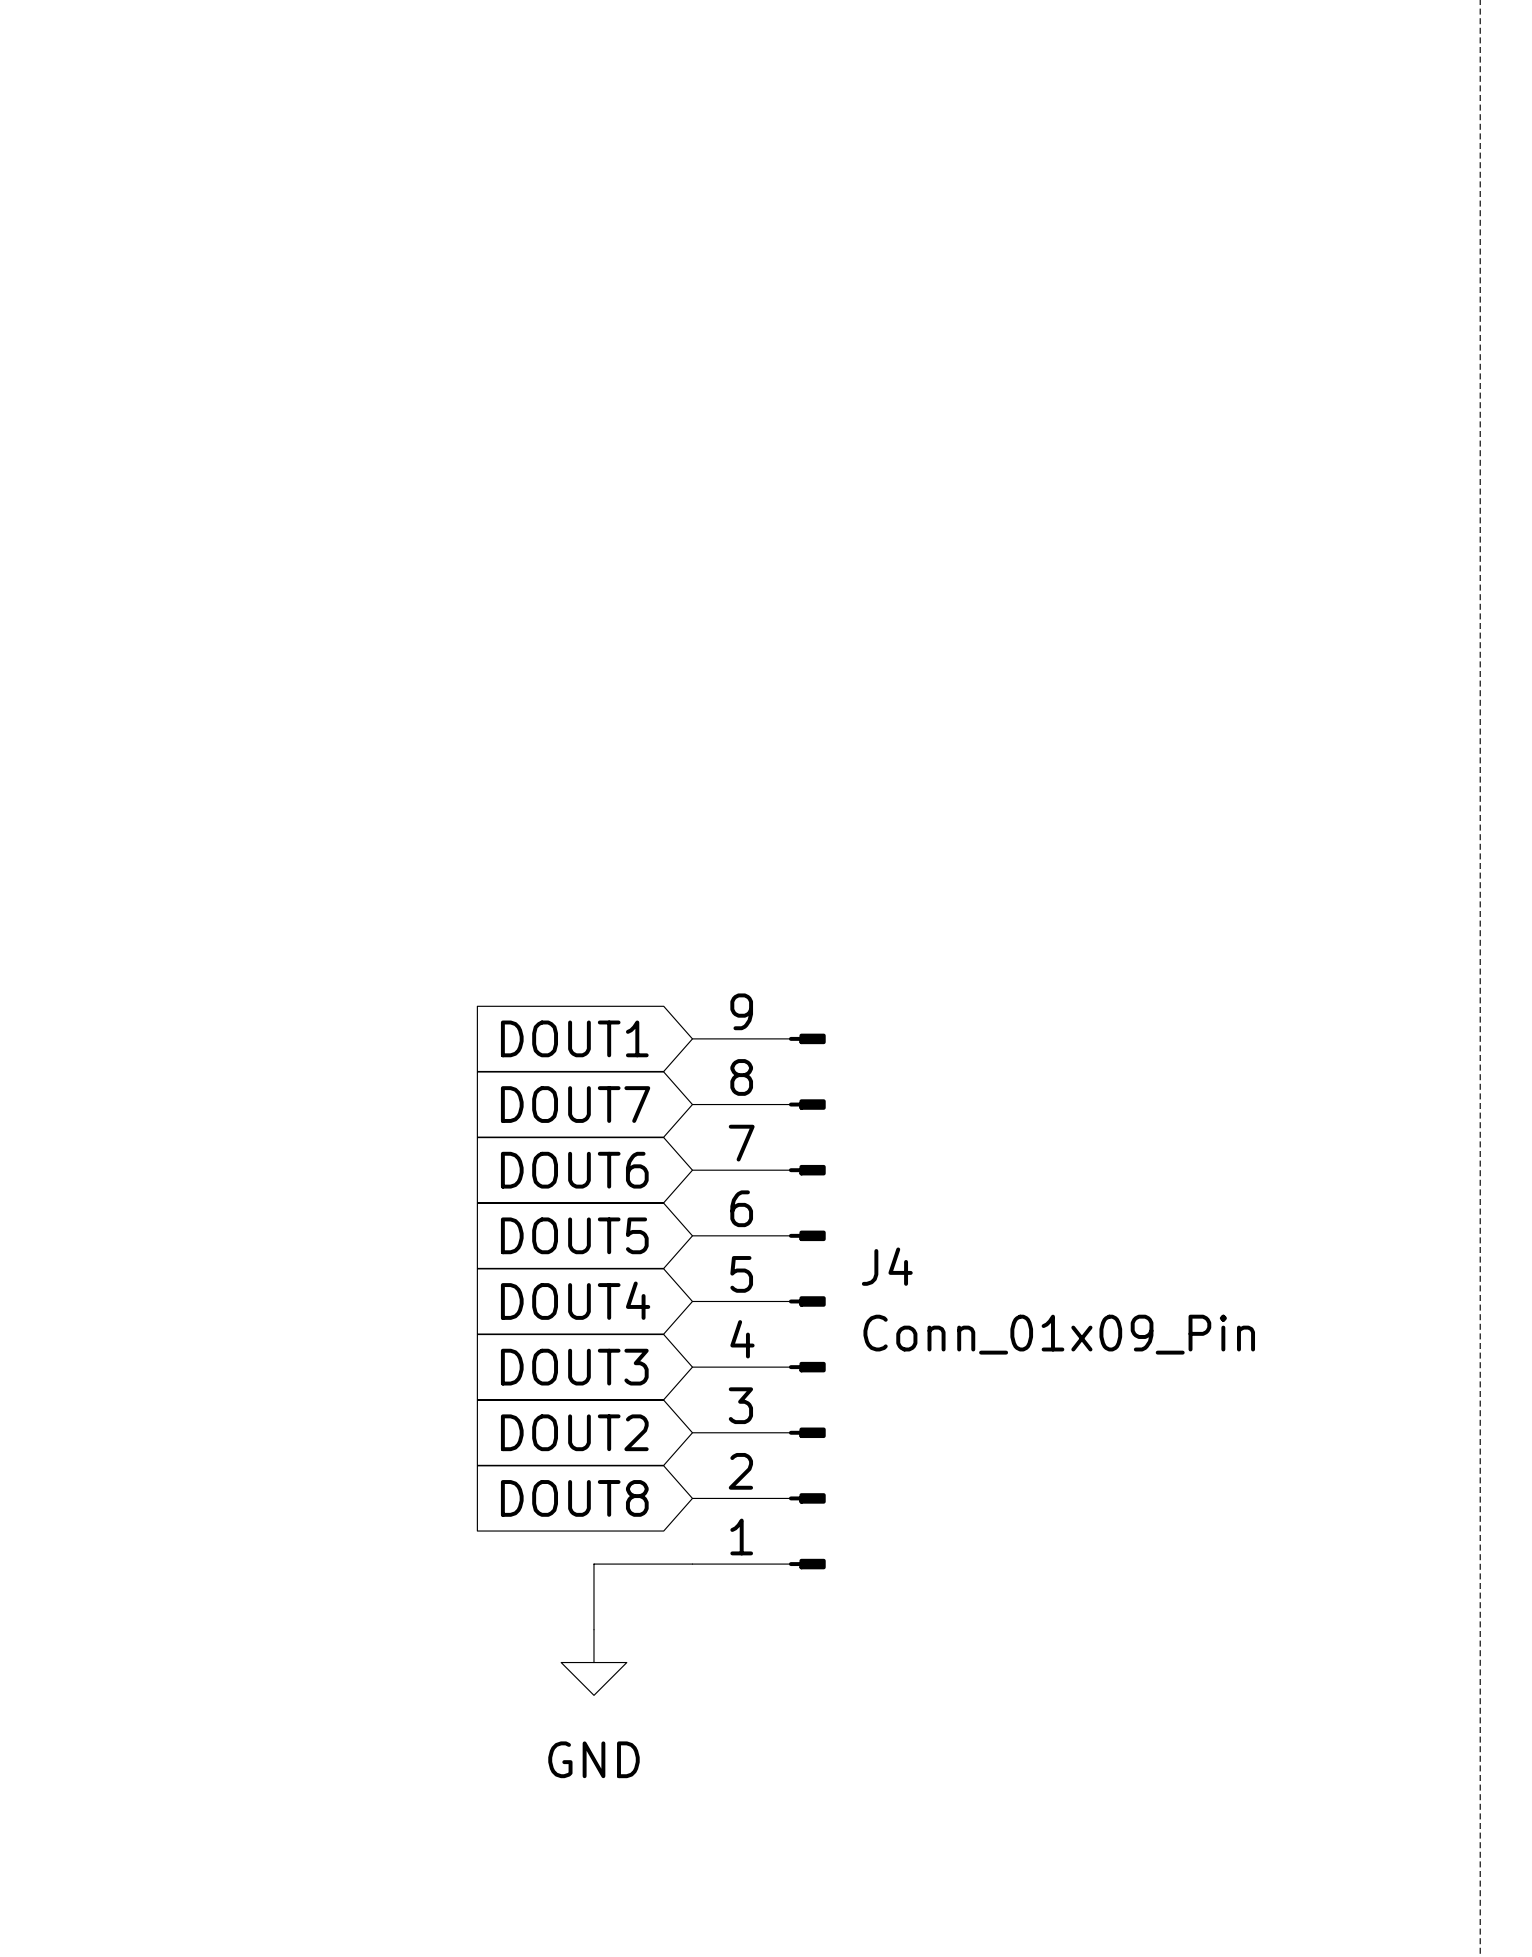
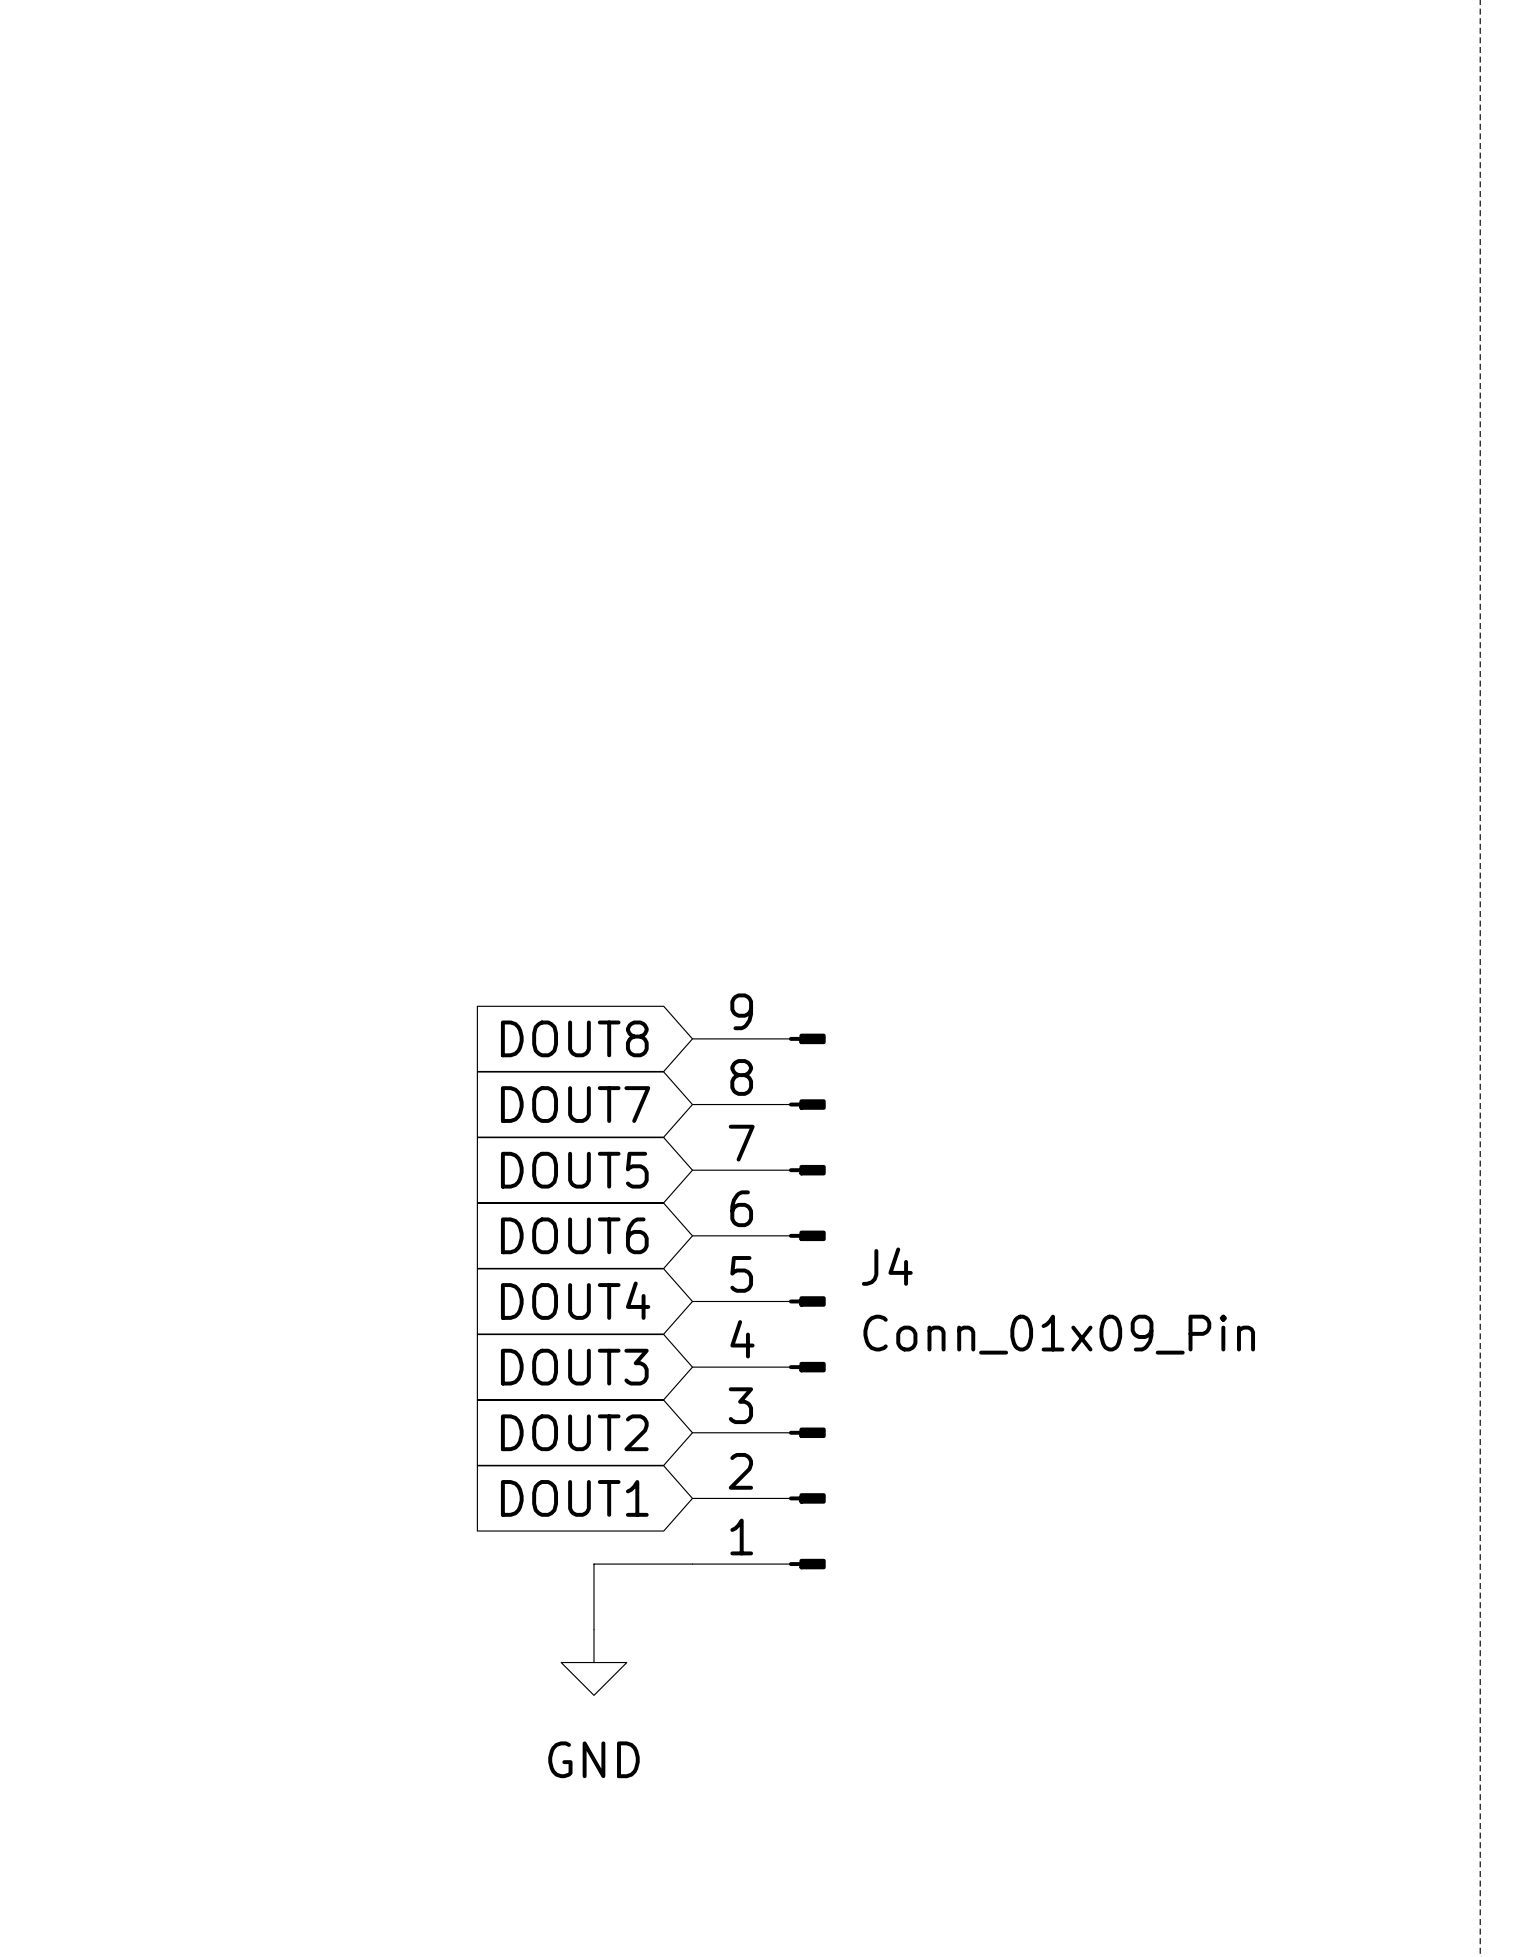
global label: DOUT1 (574, 1038) -> DOUT8 (574, 1038)
global label: DOUT6 (574, 1170) -> DOUT5 (574, 1170)
global label: DOUT5 (574, 1235) -> DOUT6 (574, 1235)
global label: DOUT8 (574, 1498) -> DOUT1 (574, 1498)

